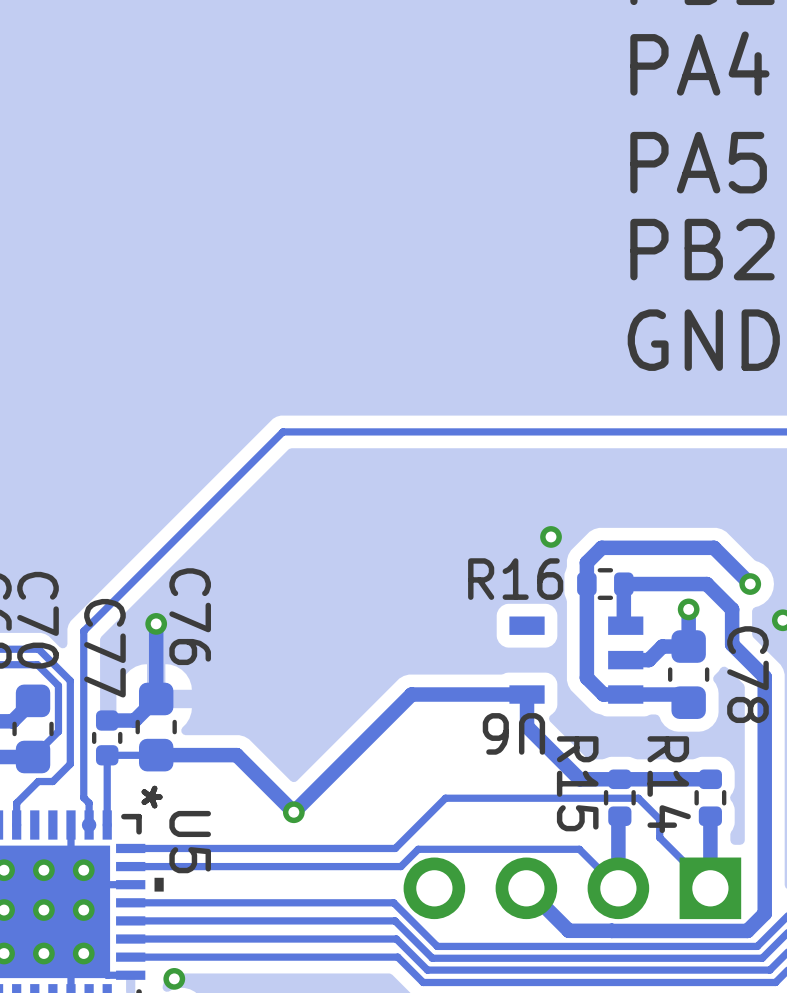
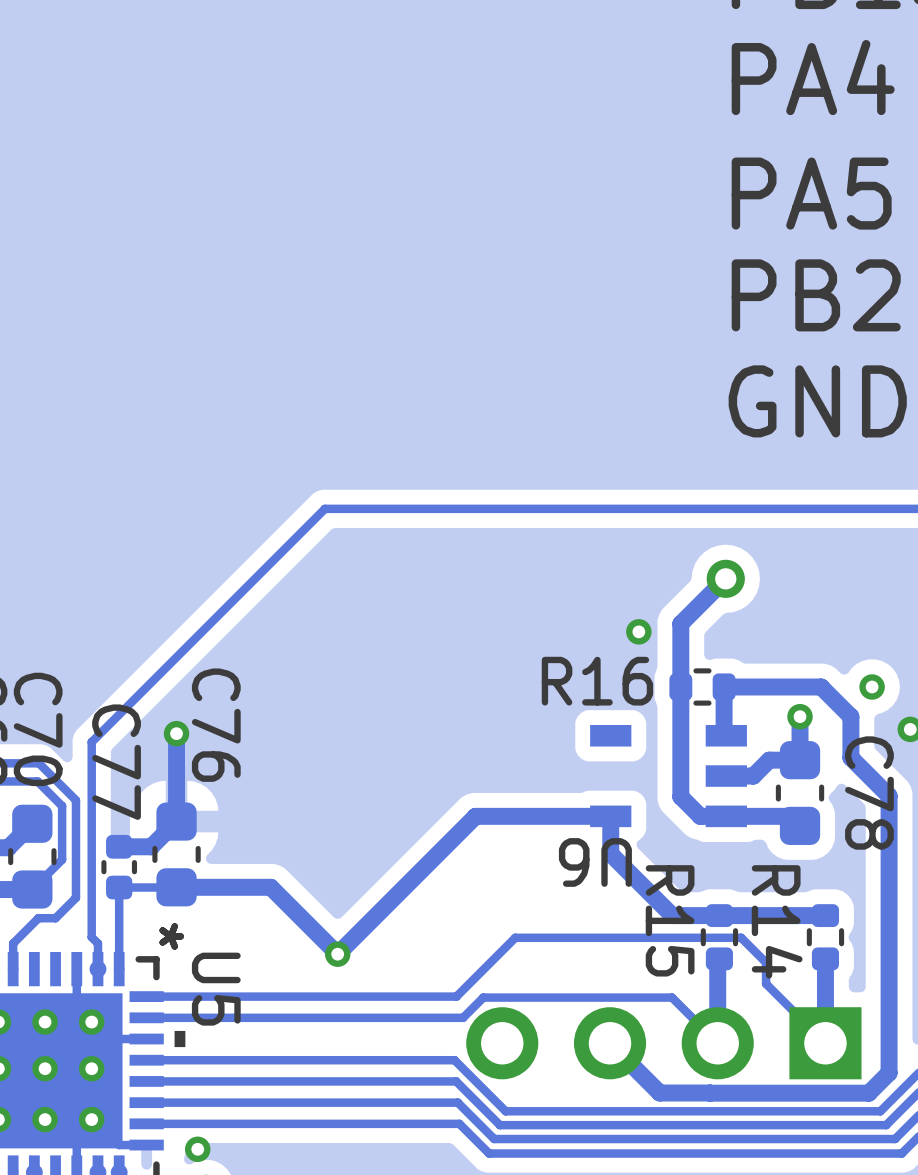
via: none -> (725, 578)
track: (586, 562) (601, 547) (714, 547) (750, 584) -> (680, 661) (680, 623) (725, 578)

